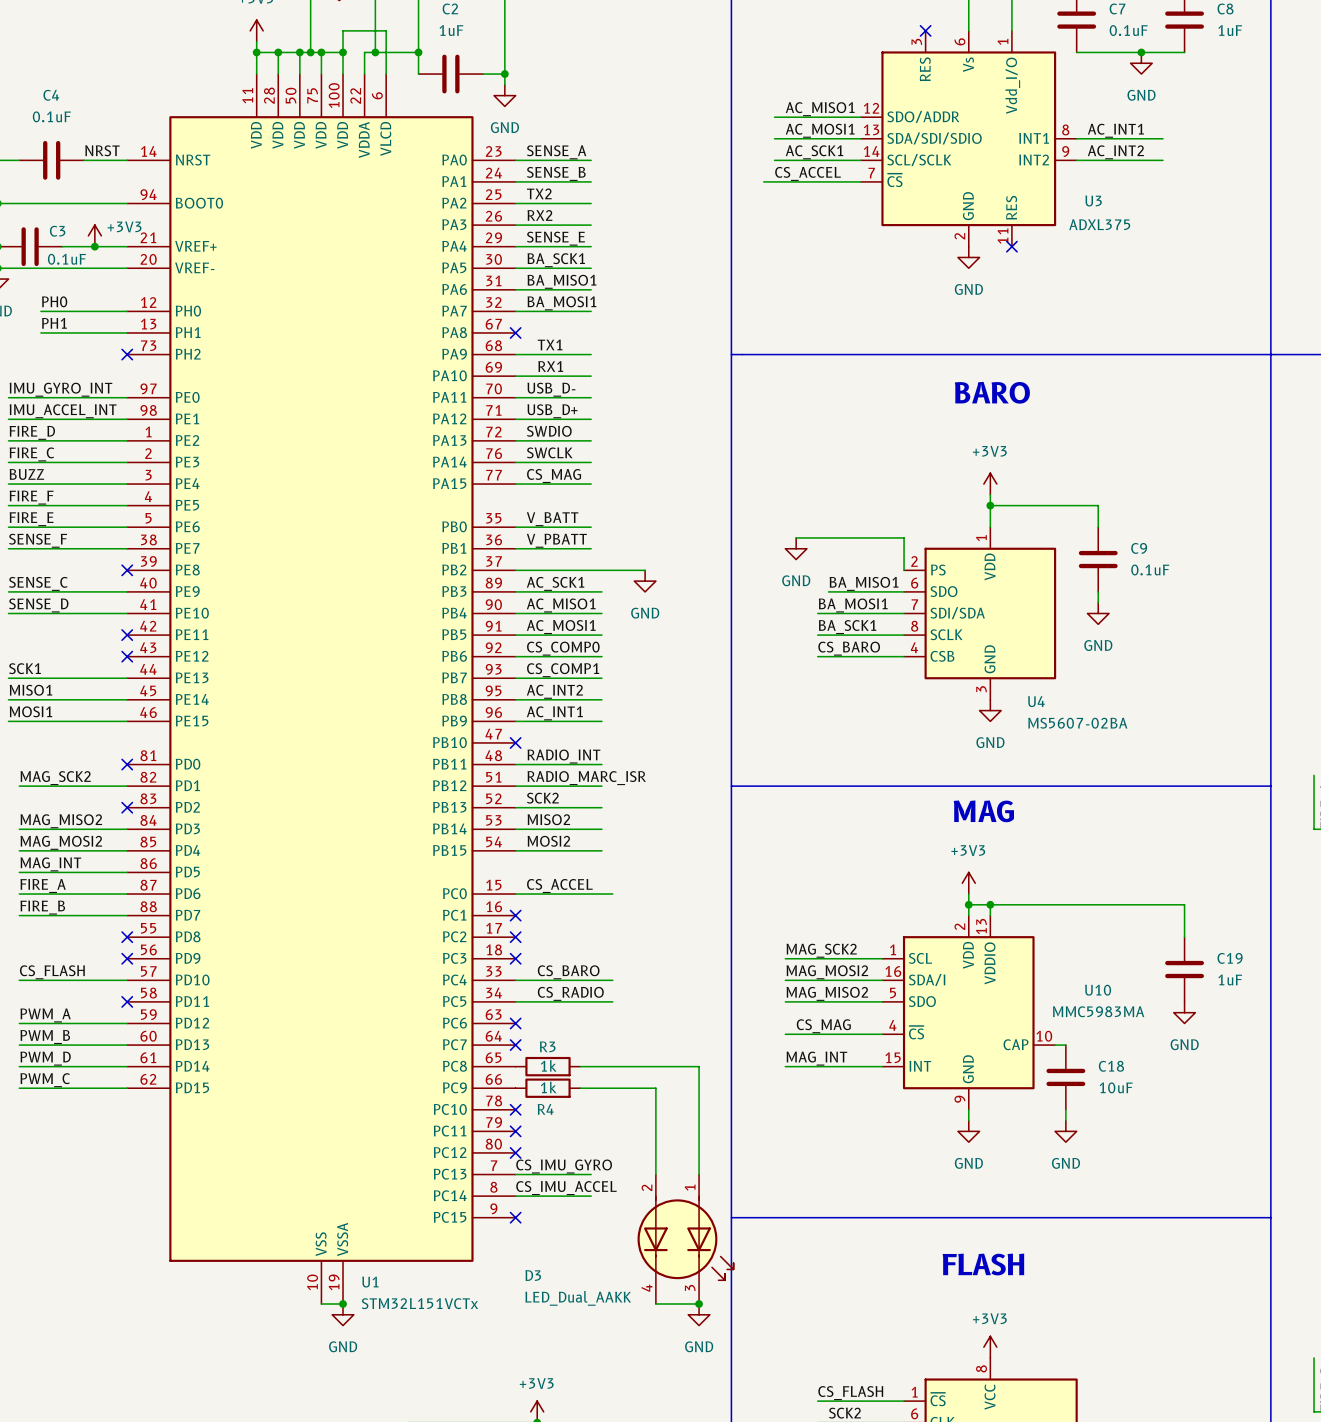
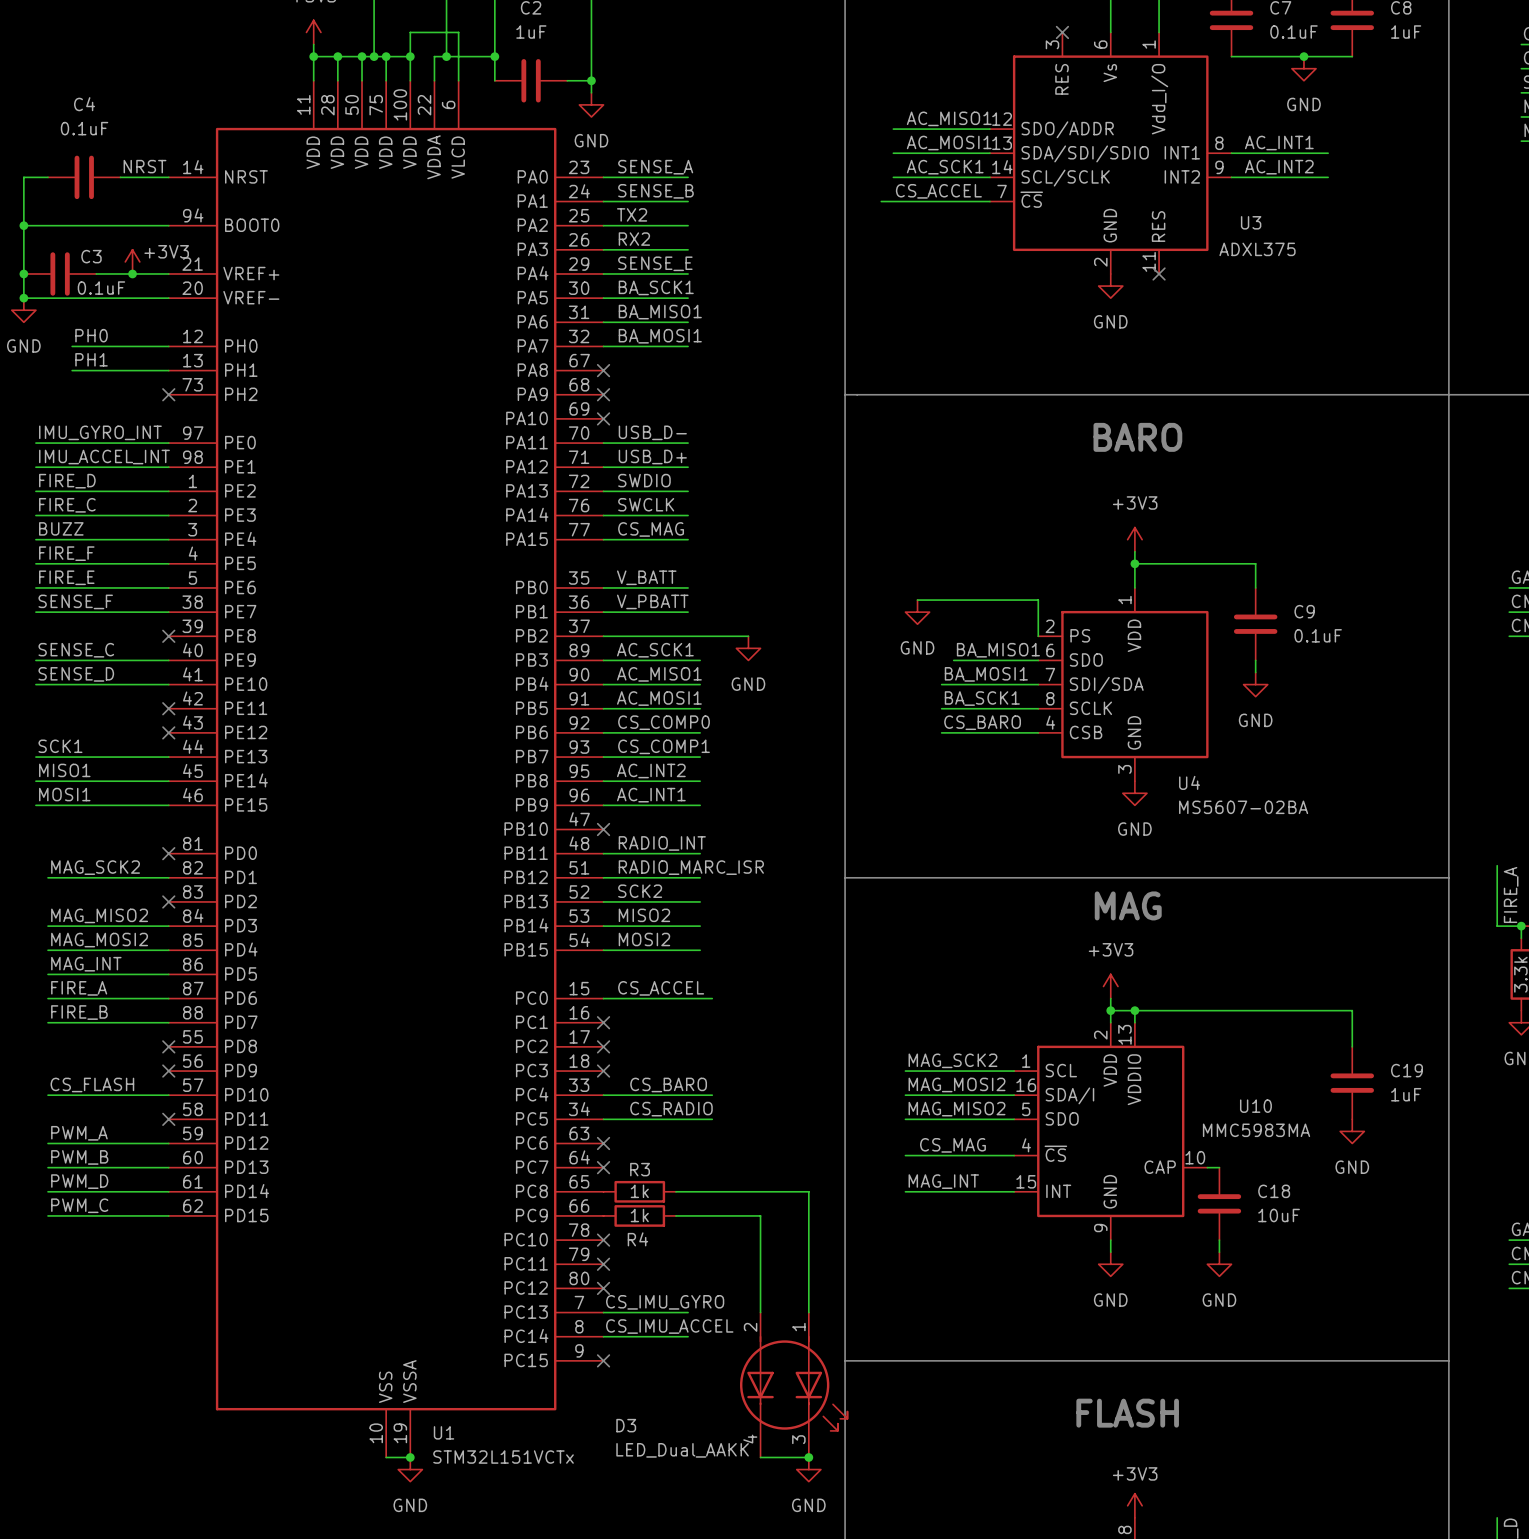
label: TX1 (550, 344) -> none
wire: (515, 354) (591, 354) -> none
no-connect mark: none -> (603, 394)
label: RX1 (550, 366) -> none
wire: (515, 376) (591, 376) -> none
no-connect mark: none -> (603, 418)

